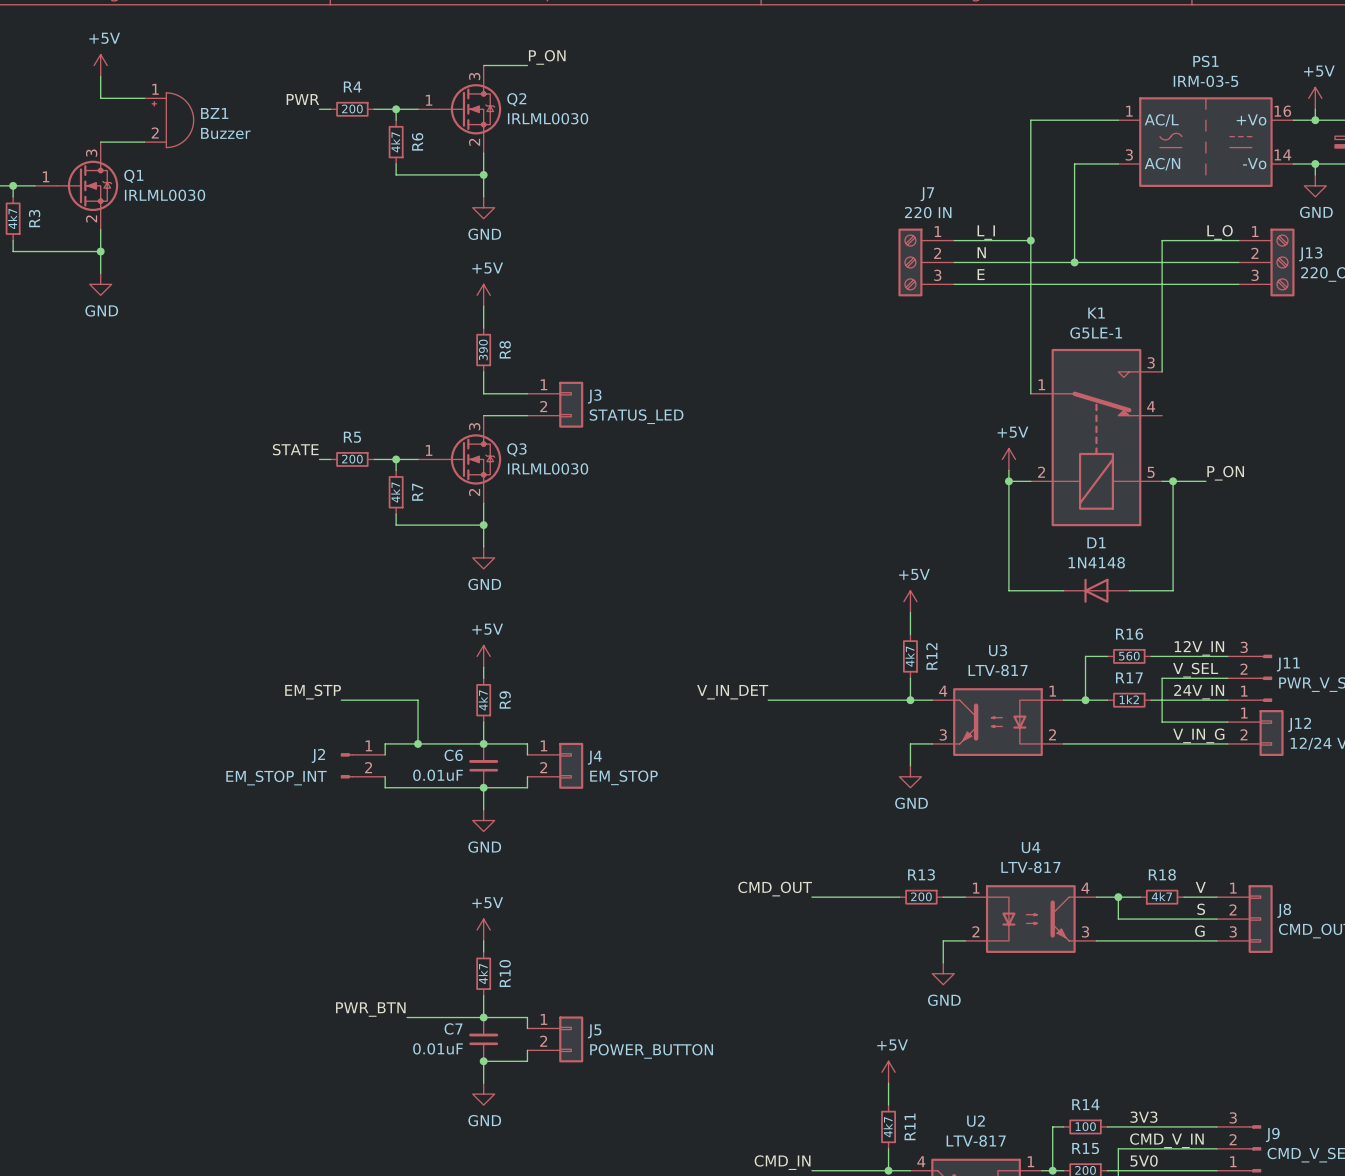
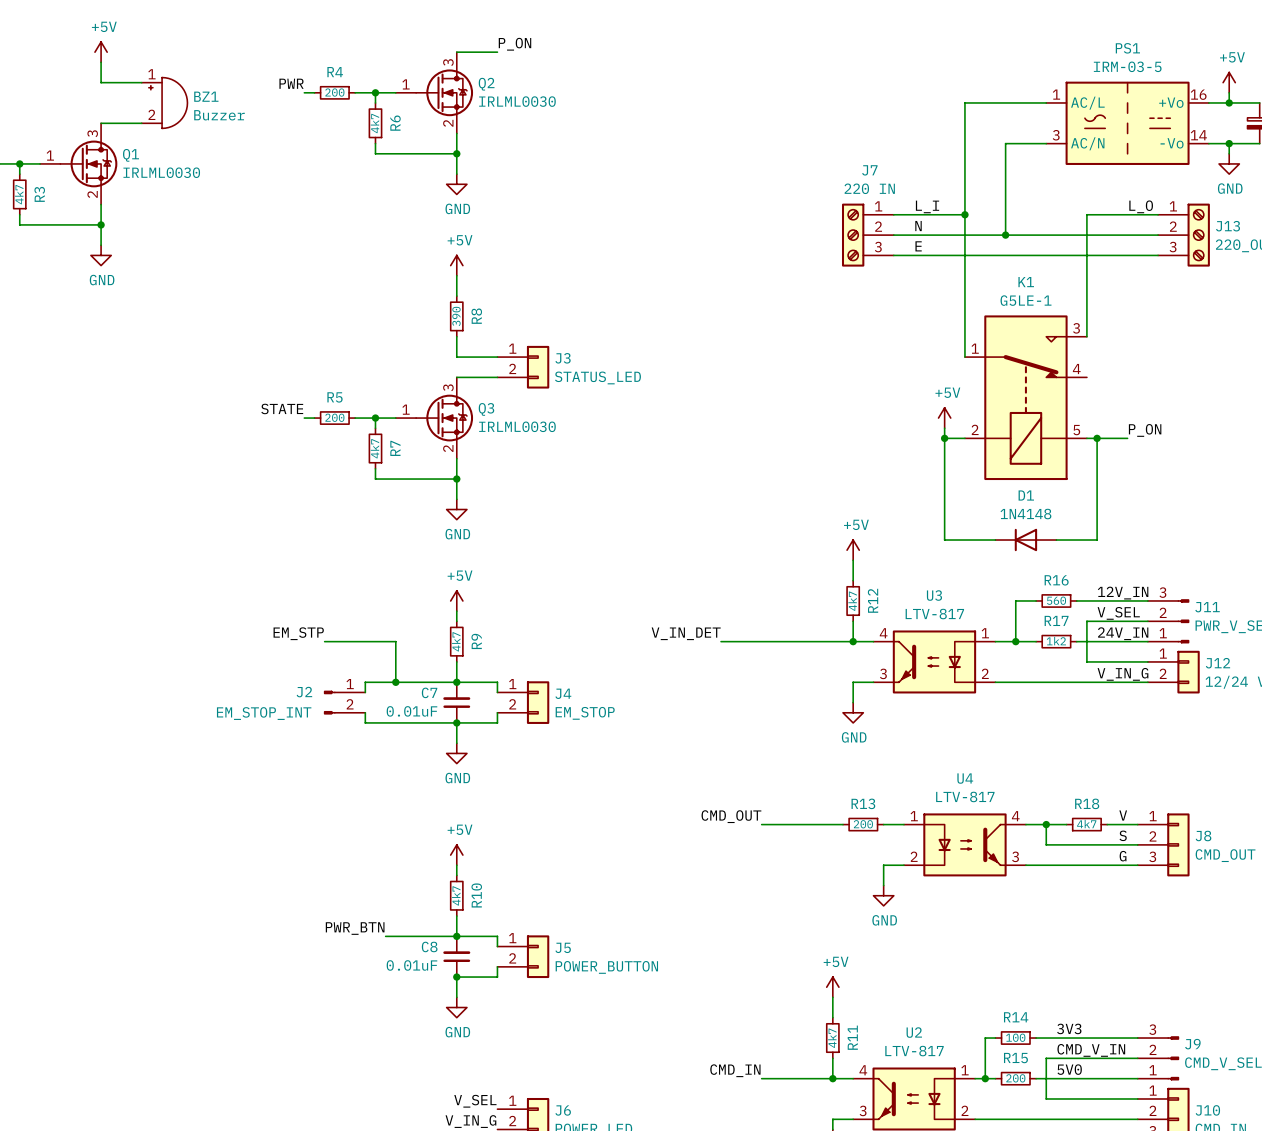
C6 name: C6 (453, 755) -> C7 (429, 692)
C7 name: C7 (453, 1028) -> C8 (429, 946)

